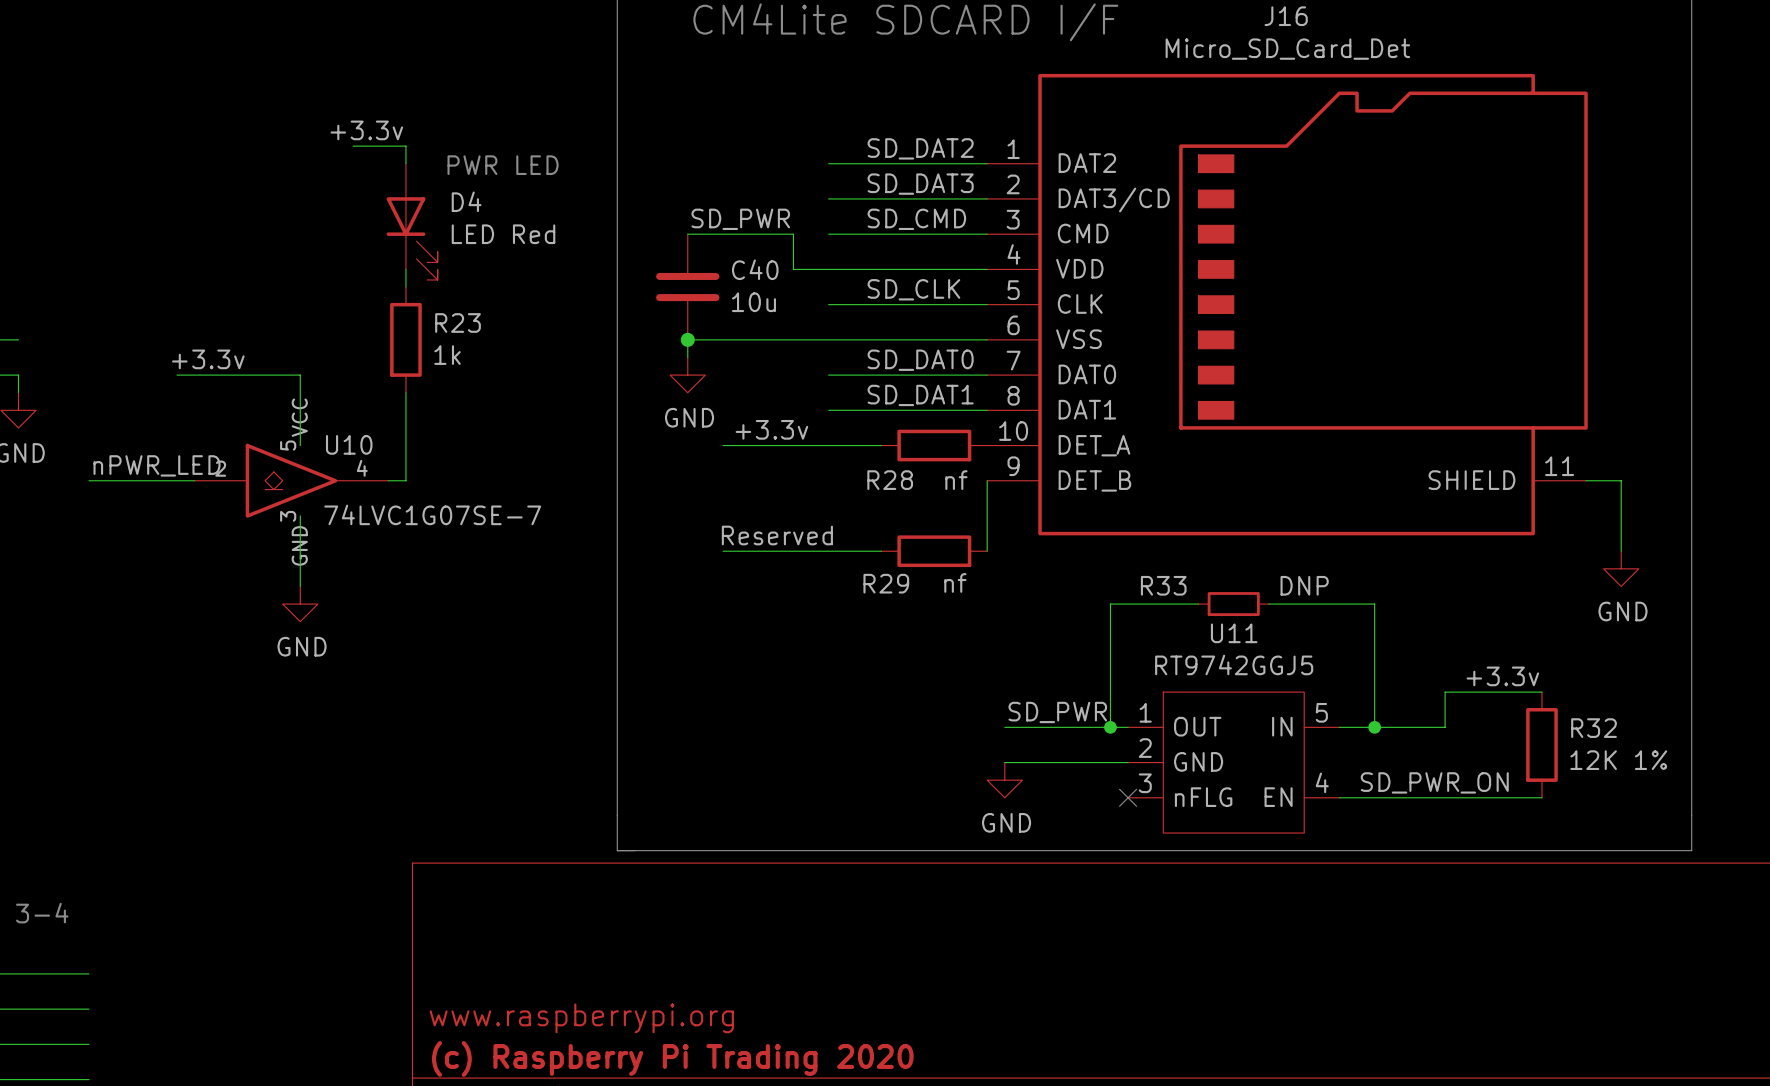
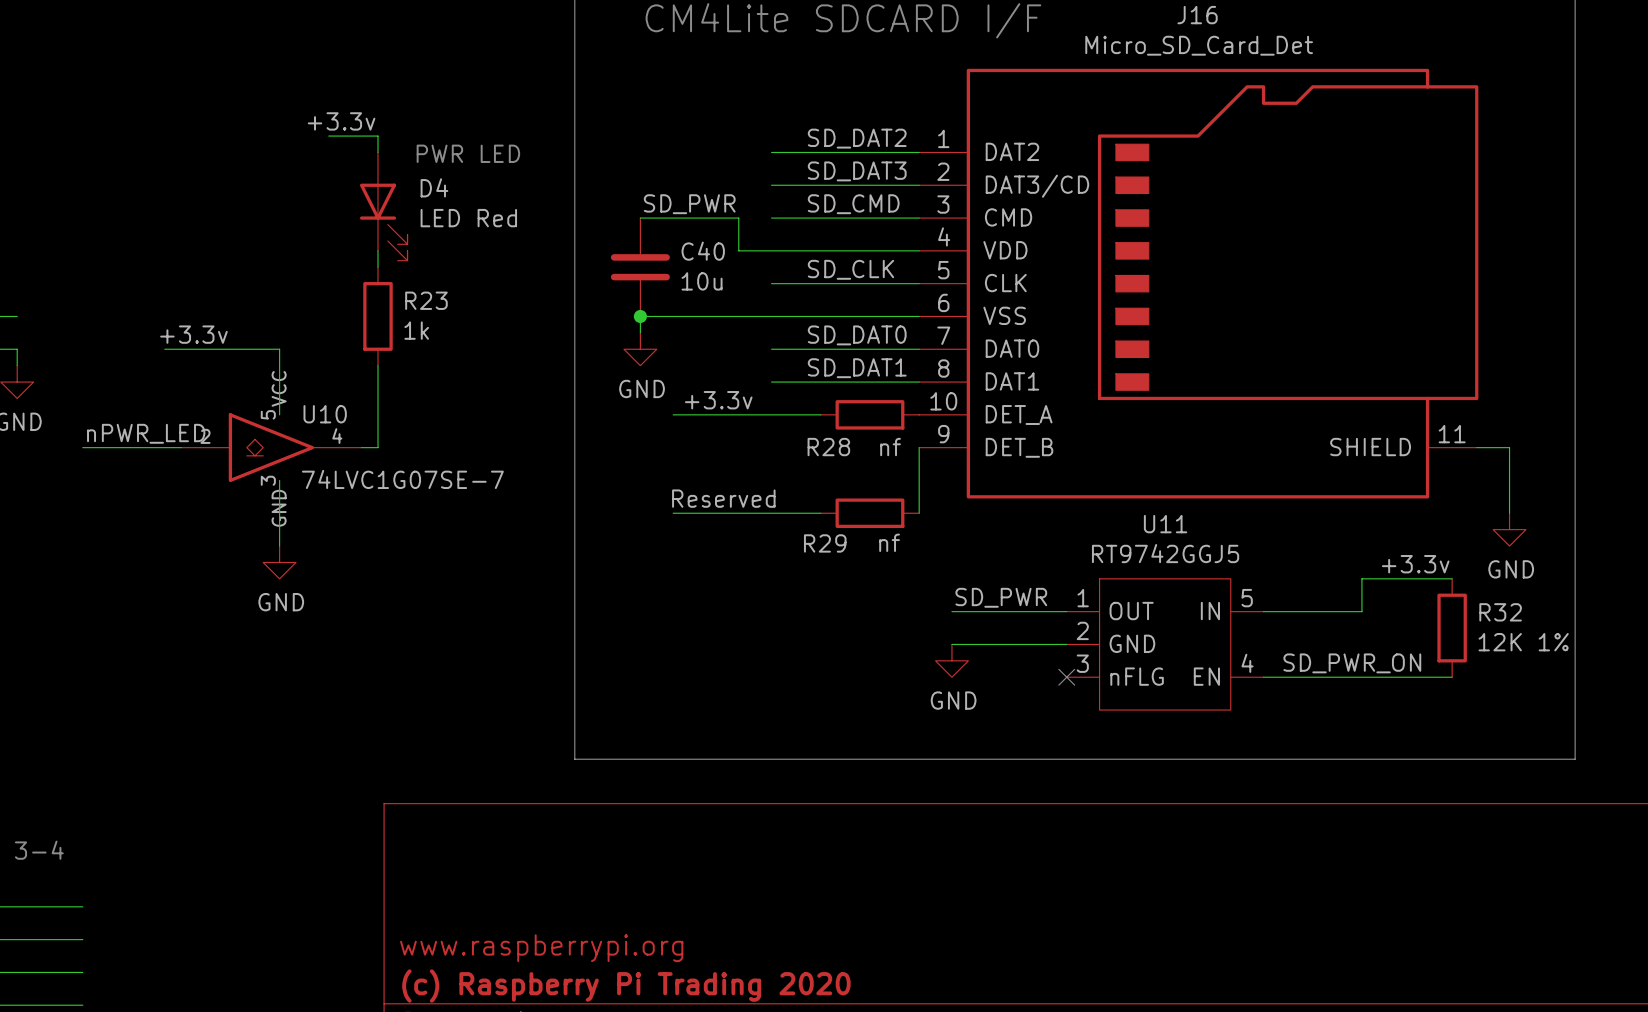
wire: (1198, 604) (1110, 604) (1110, 727) -> none
R33: DNP (1233, 604) -> none
wire: (1268, 604) (1374, 604) (1374, 727) -> none
wire: none -> (1452, 578) (1361, 578) (1361, 611) (1263, 611)
label position: +3.3v (1502, 676) -> +3.3v (1415, 564)
wire: (1541, 692) (1445, 692) (1445, 727) -> (1452, 677) (1345, 677)
label position: SD_PWR (1057, 712) -> SD_PWR (1001, 597)
wire: (1004, 727) (1128, 727) -> (951, 611) (1066, 611)
junction: (1110, 727) -> none
junction: (1374, 727) -> none
R32 position: (1541, 744) -> (1452, 628)
wire: (1004, 762) (1128, 762) -> (951, 644) (1066, 644)
U11 position: (1233, 762) -> (1165, 644)
power symbol position: GND (1004, 780) -> GND (951, 660)
label position: SD_PWR_ON (1434, 782) -> SD_PWR_ON (1352, 663)
no-connect mark position: (1128, 797) -> (1066, 677)
wire: (1339, 797) (1541, 797) -> none
line: (617, 815) (617, 850) (1691, 850) (1691, 815) -> (574, 759) (1575, 759)

